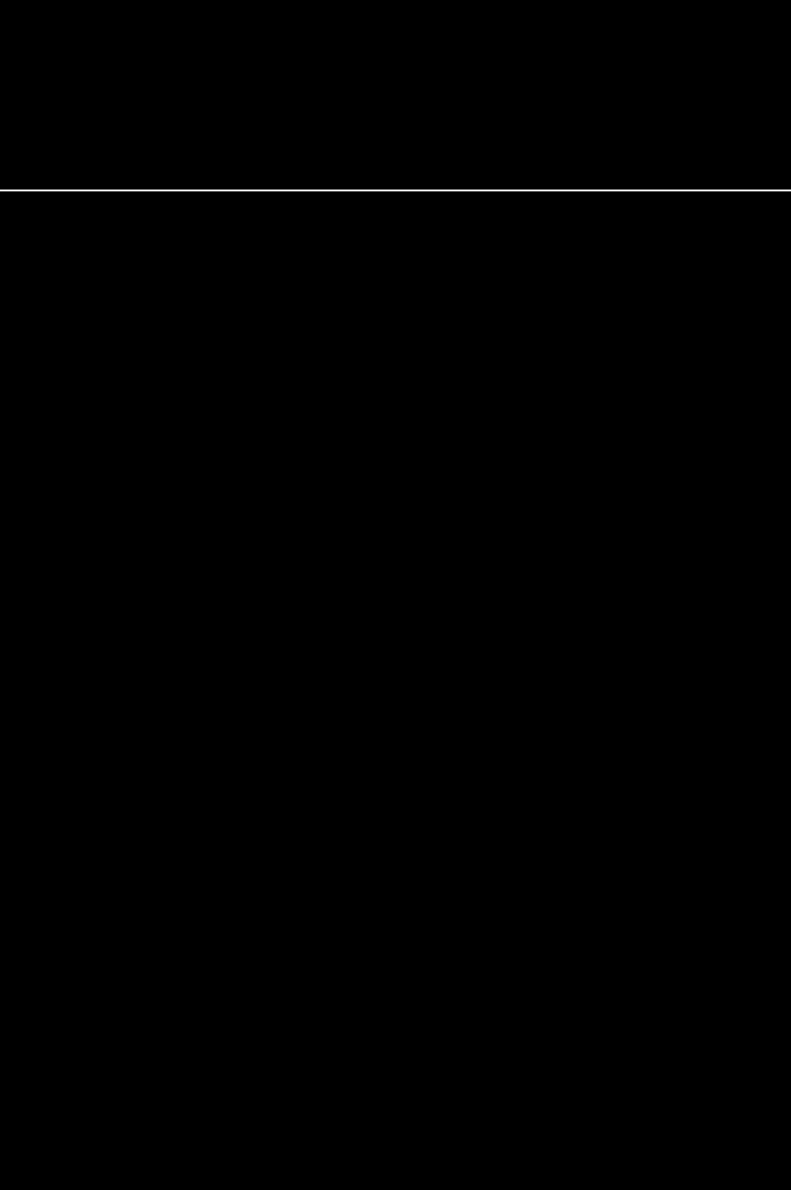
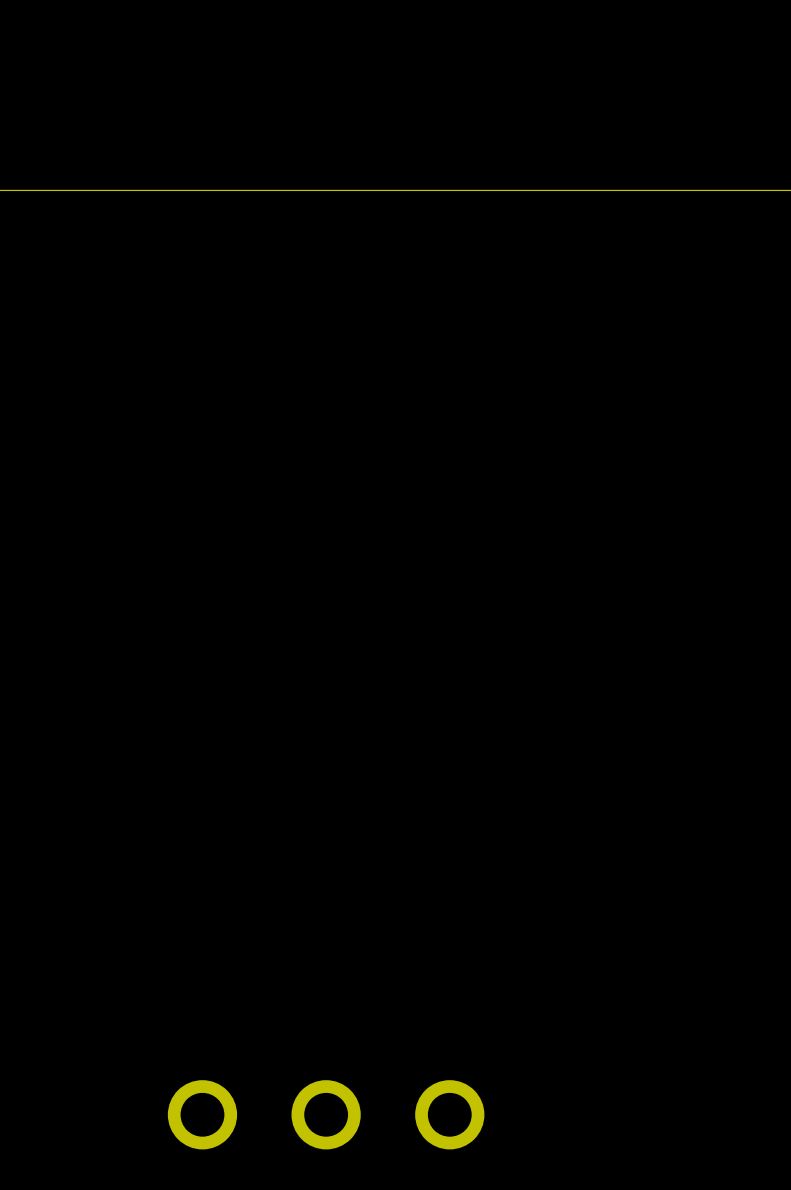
part: none -> (326, 1114)

